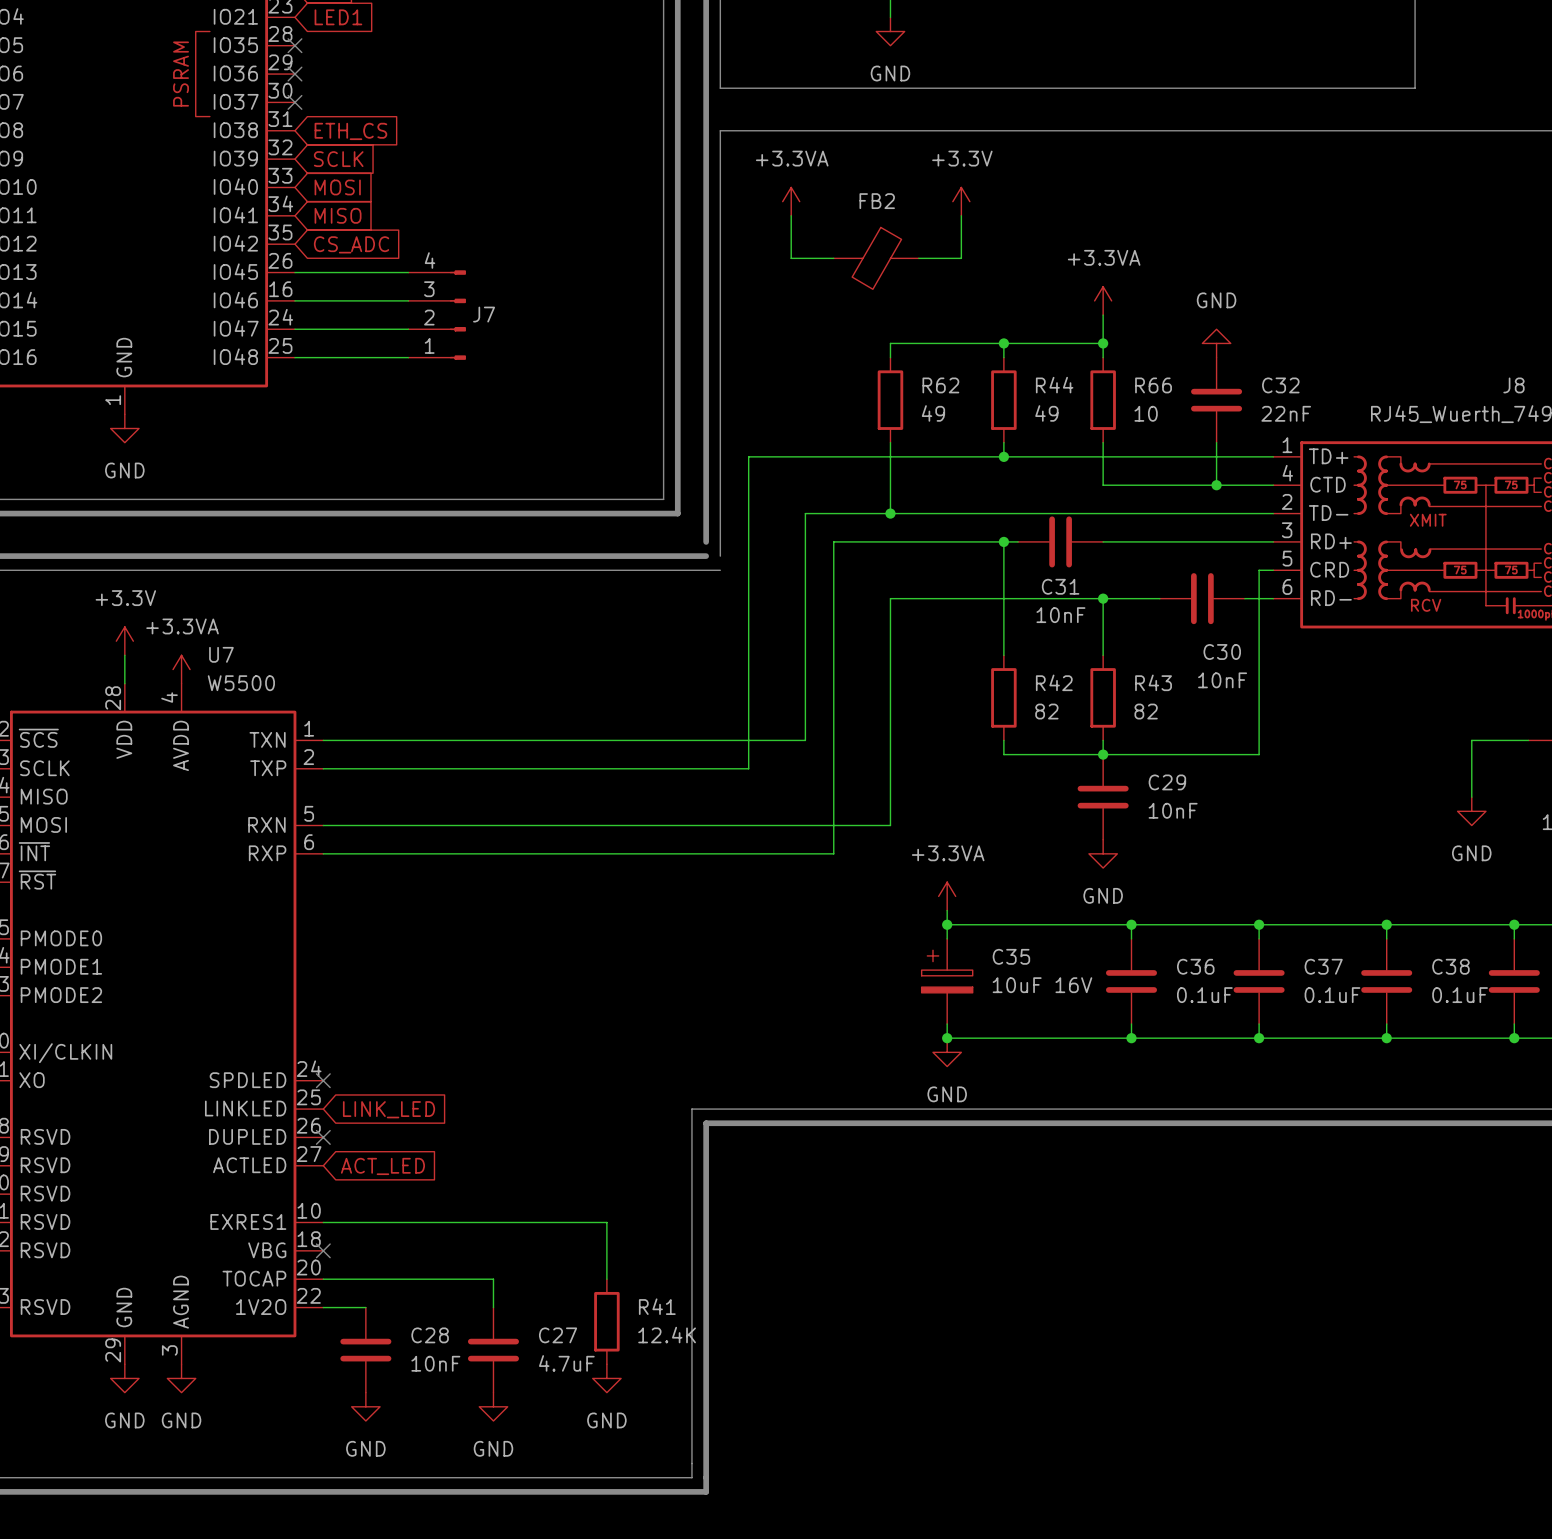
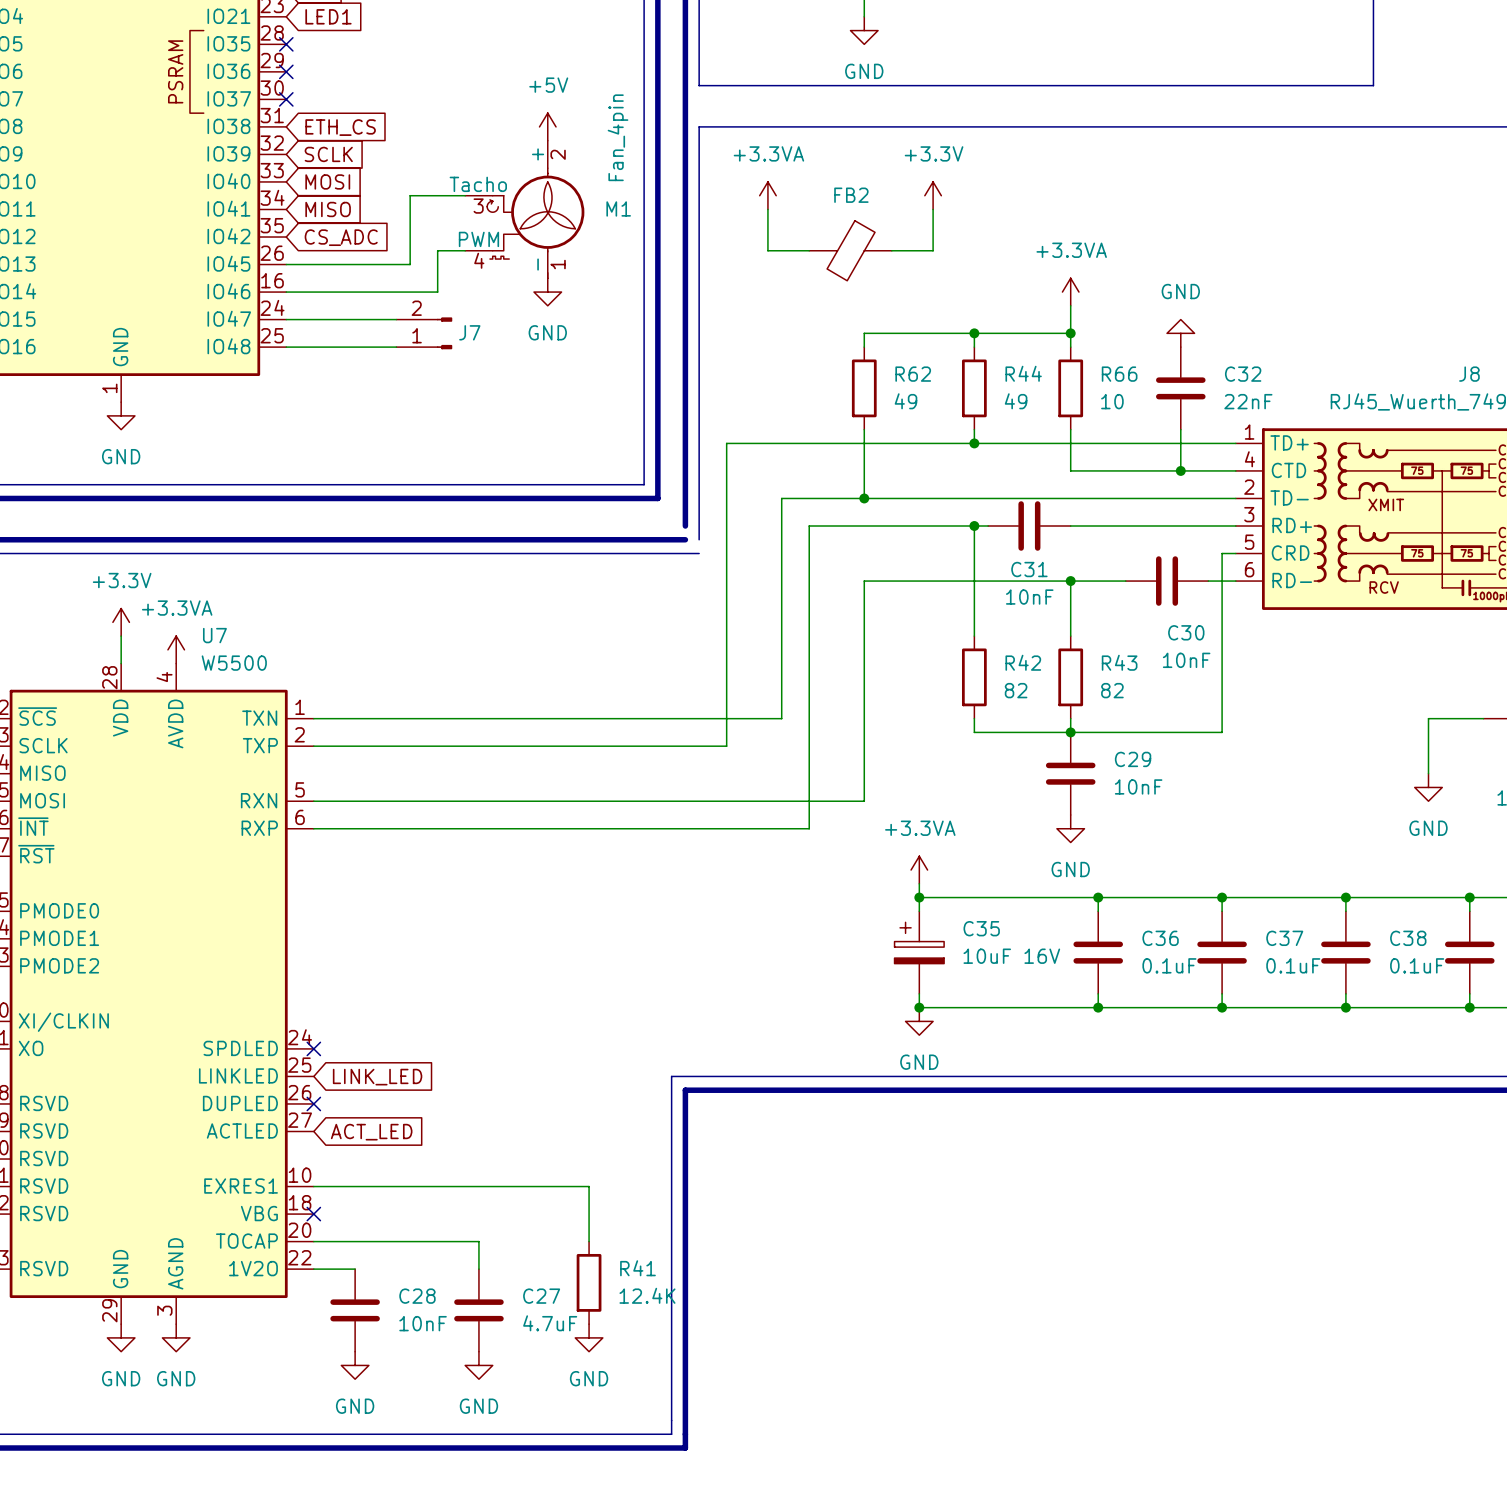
power symbol: none -> +5V (547, 126)
wire: none -> (465, 195) (410, 195) (410, 264) (396, 264)
M1: none -> Fan_4pin (524, 209)
wire: none -> (465, 250) (437, 250) (437, 292) (396, 292)
J7 symbol: [408, 270, 466, 360] -> [396, 317, 453, 350]
power symbol: none -> GND (547, 292)

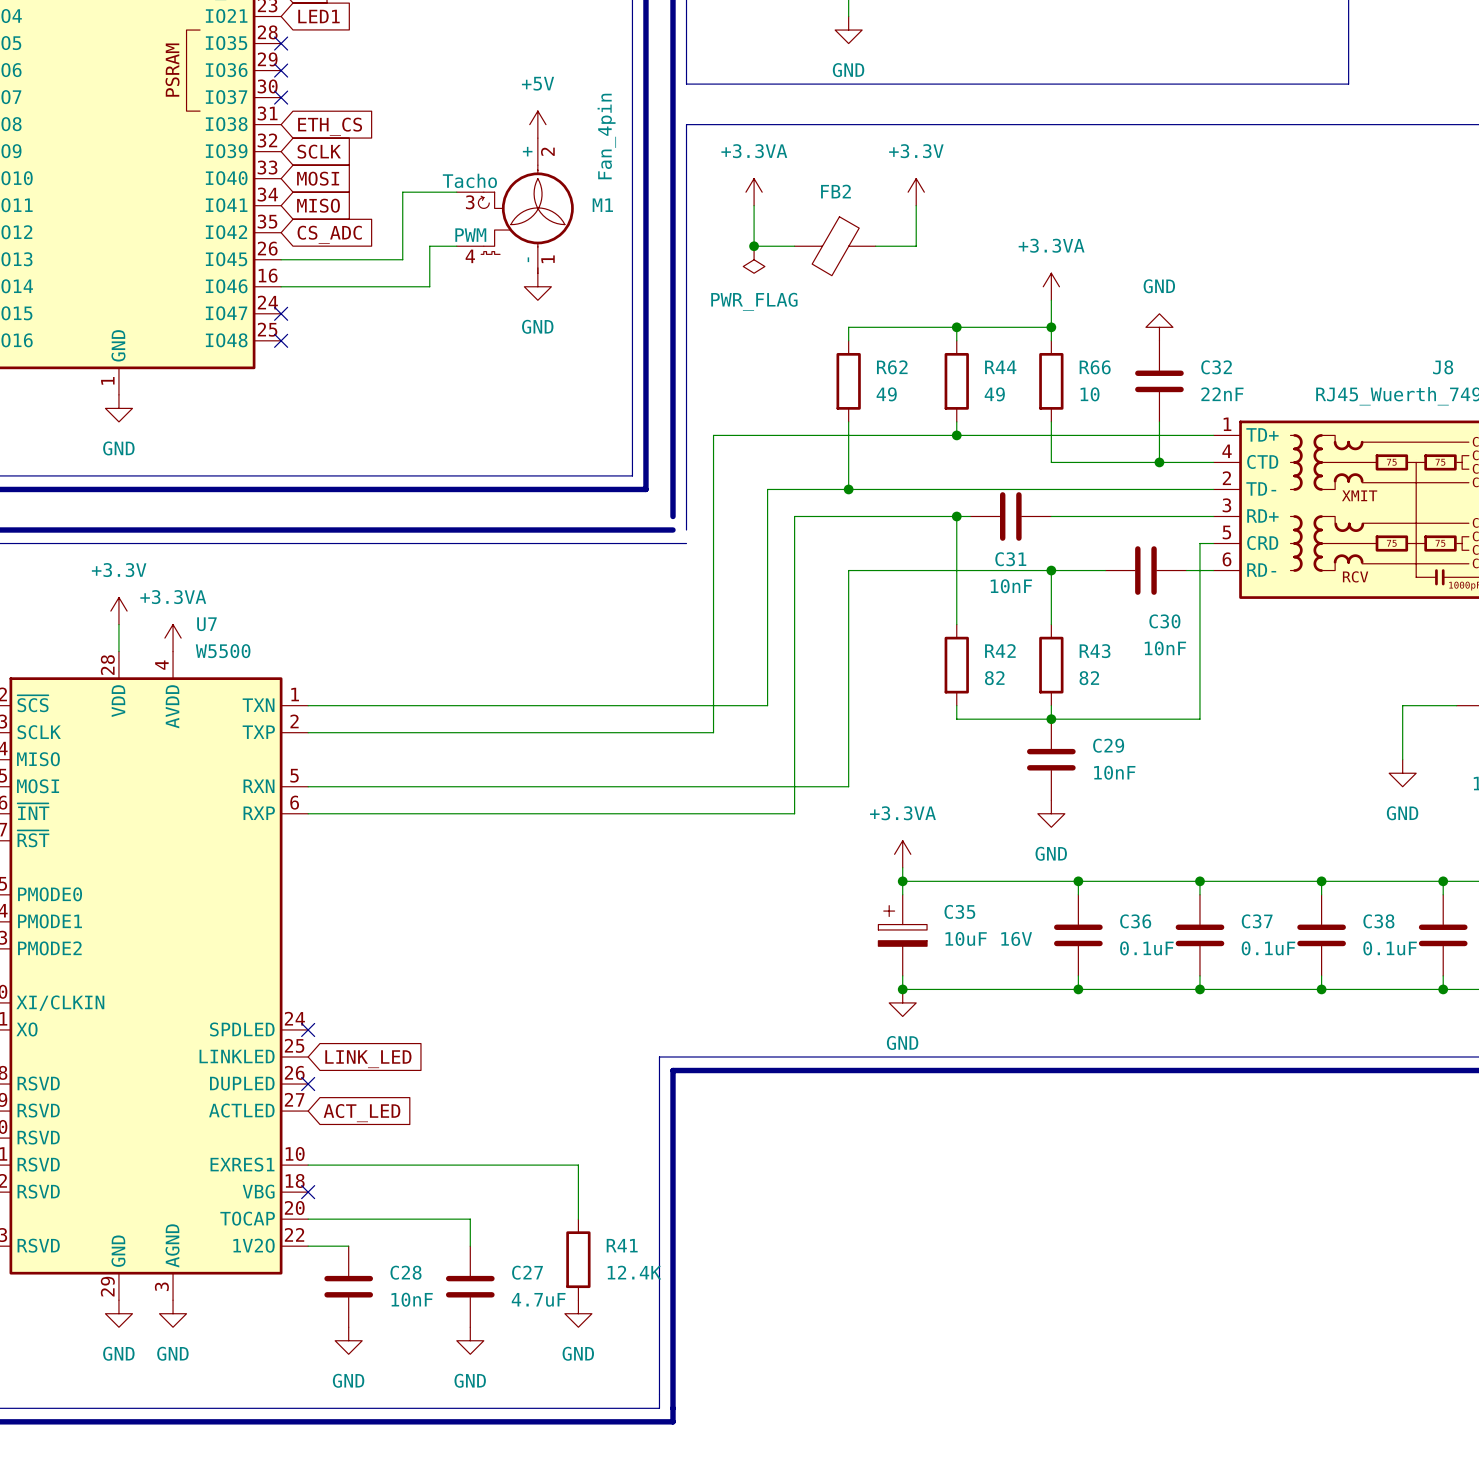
junction: none -> (754, 246)
power symbol: none -> PWR_FLAG (754, 259)
wire: (286, 319) (396, 319) -> none
no-connect mark: none -> (281, 313)
J7: (424, 333) -> none
wire: (286, 347) (396, 347) -> none
no-connect mark: none -> (281, 340)

